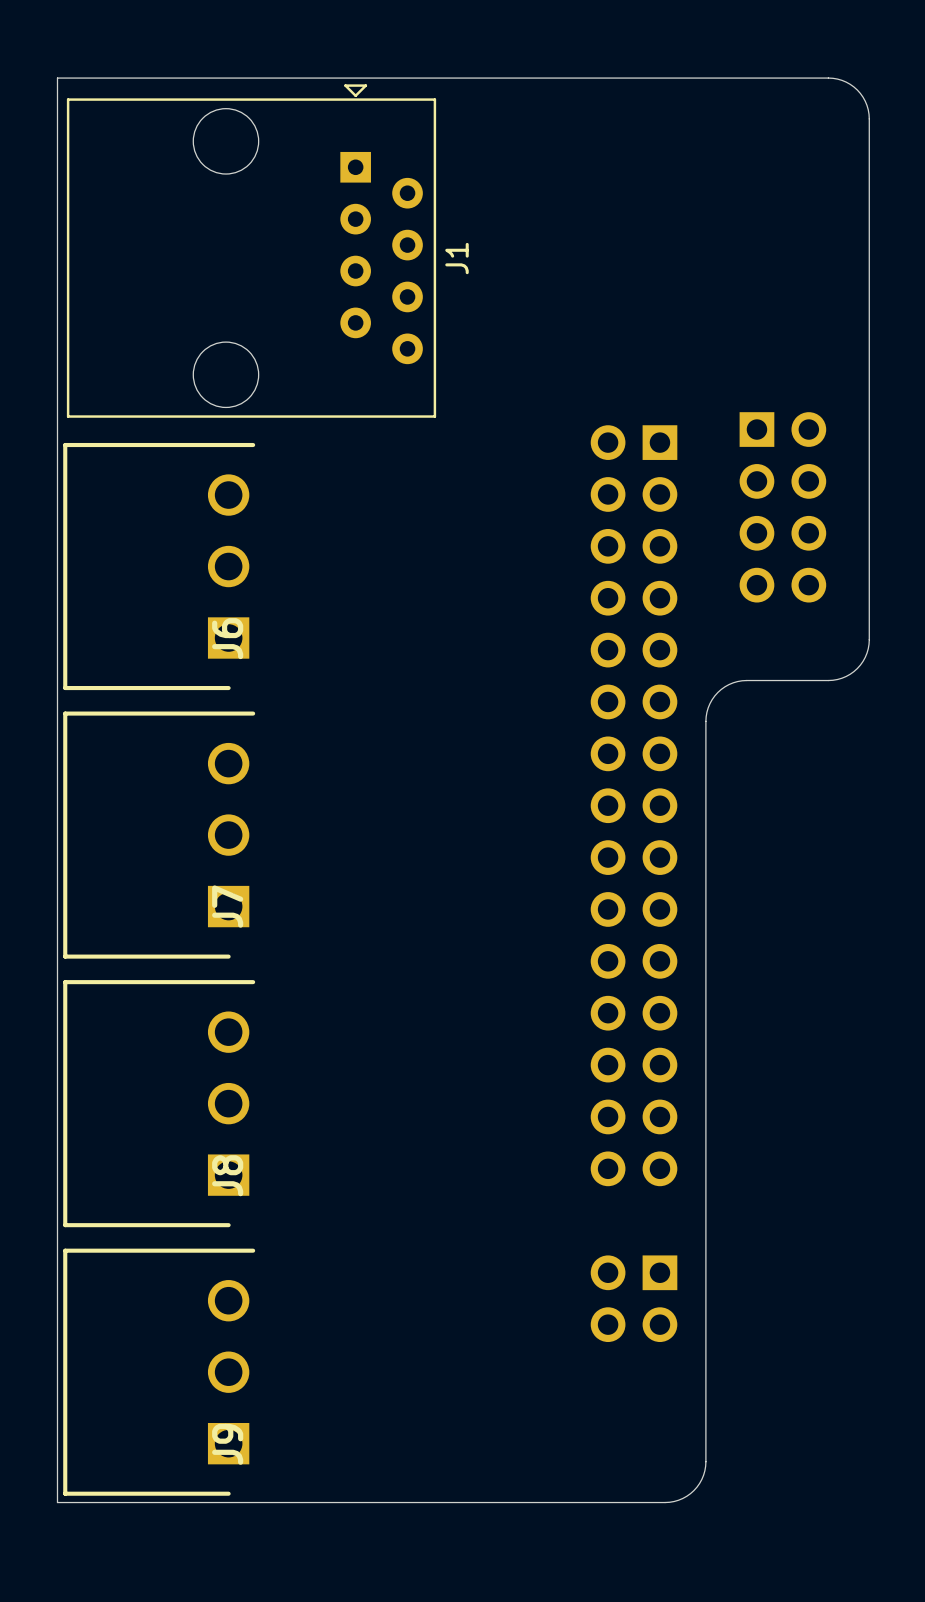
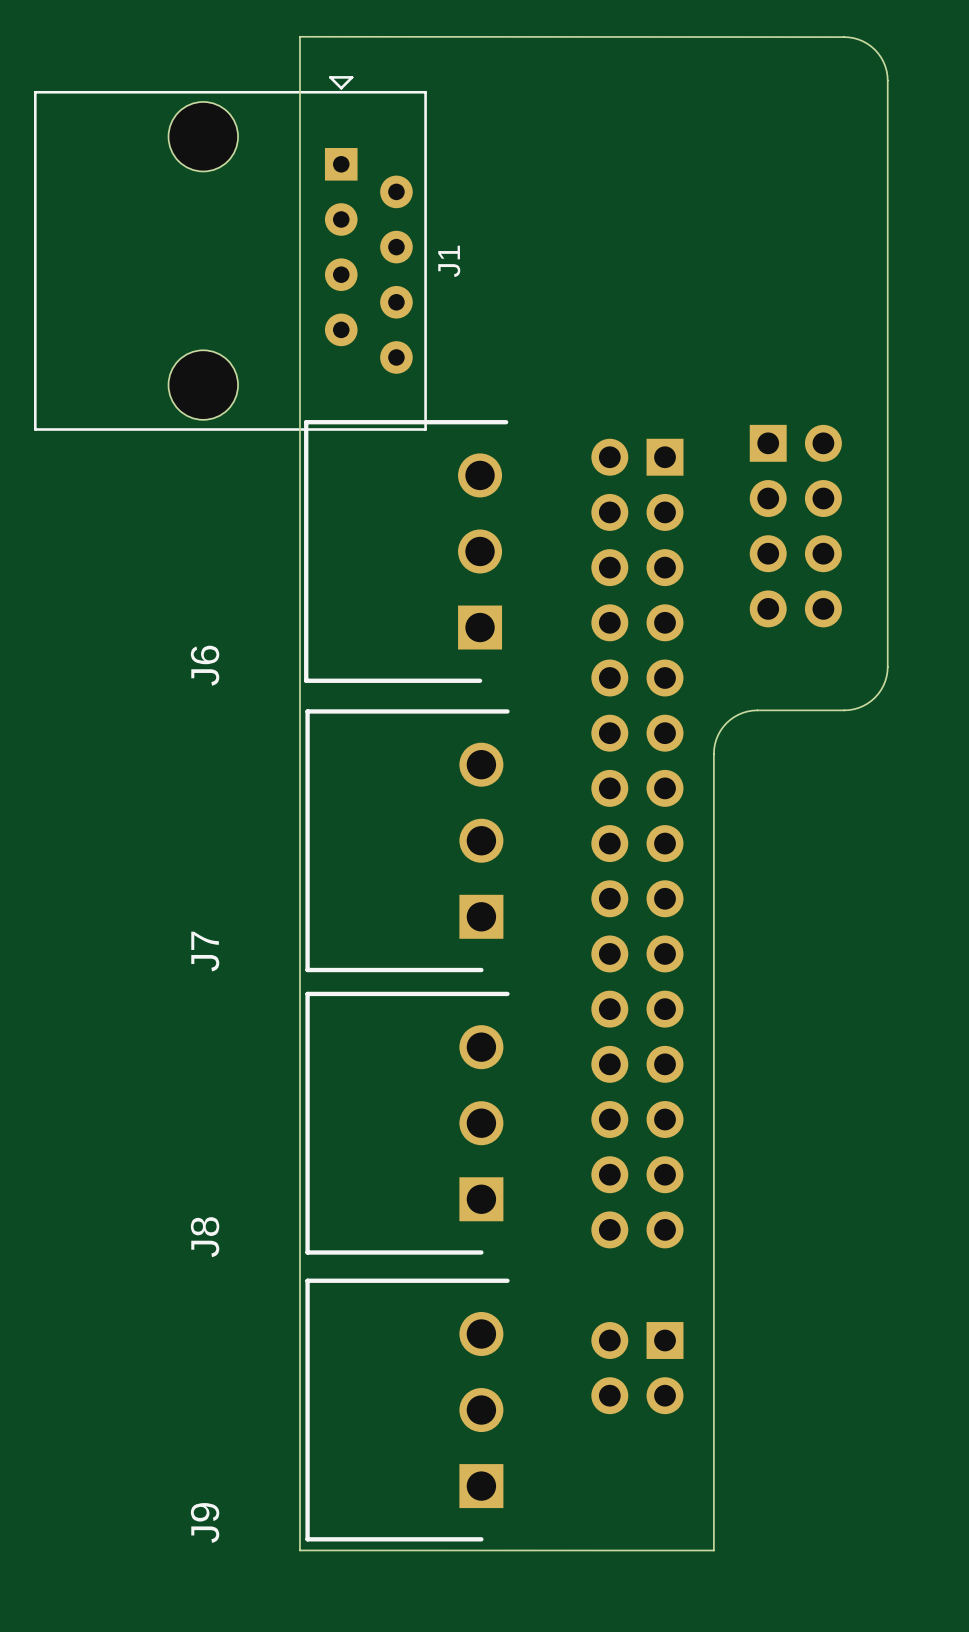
board edge: (869, 118) (865, 101) (857, 90) (841, 80) (828, 78) (57, 78) (57, 1502) (669, 1502) (686, 1496) (697, 1487) (703, 1475) (705, 1461) -> (887, 112) (887, 75) (883, 61) (878, 53) (867, 43) (849, 37) (299, 36) (299, 1550) (713, 1550) (713, 1541)
J6 position: (159, 566) -> (406, 551)
J7 position: (159, 835) -> (407, 840)
J8 position: (159, 1103) -> (407, 1123)
J9 position: (159, 1372) -> (407, 1410)

